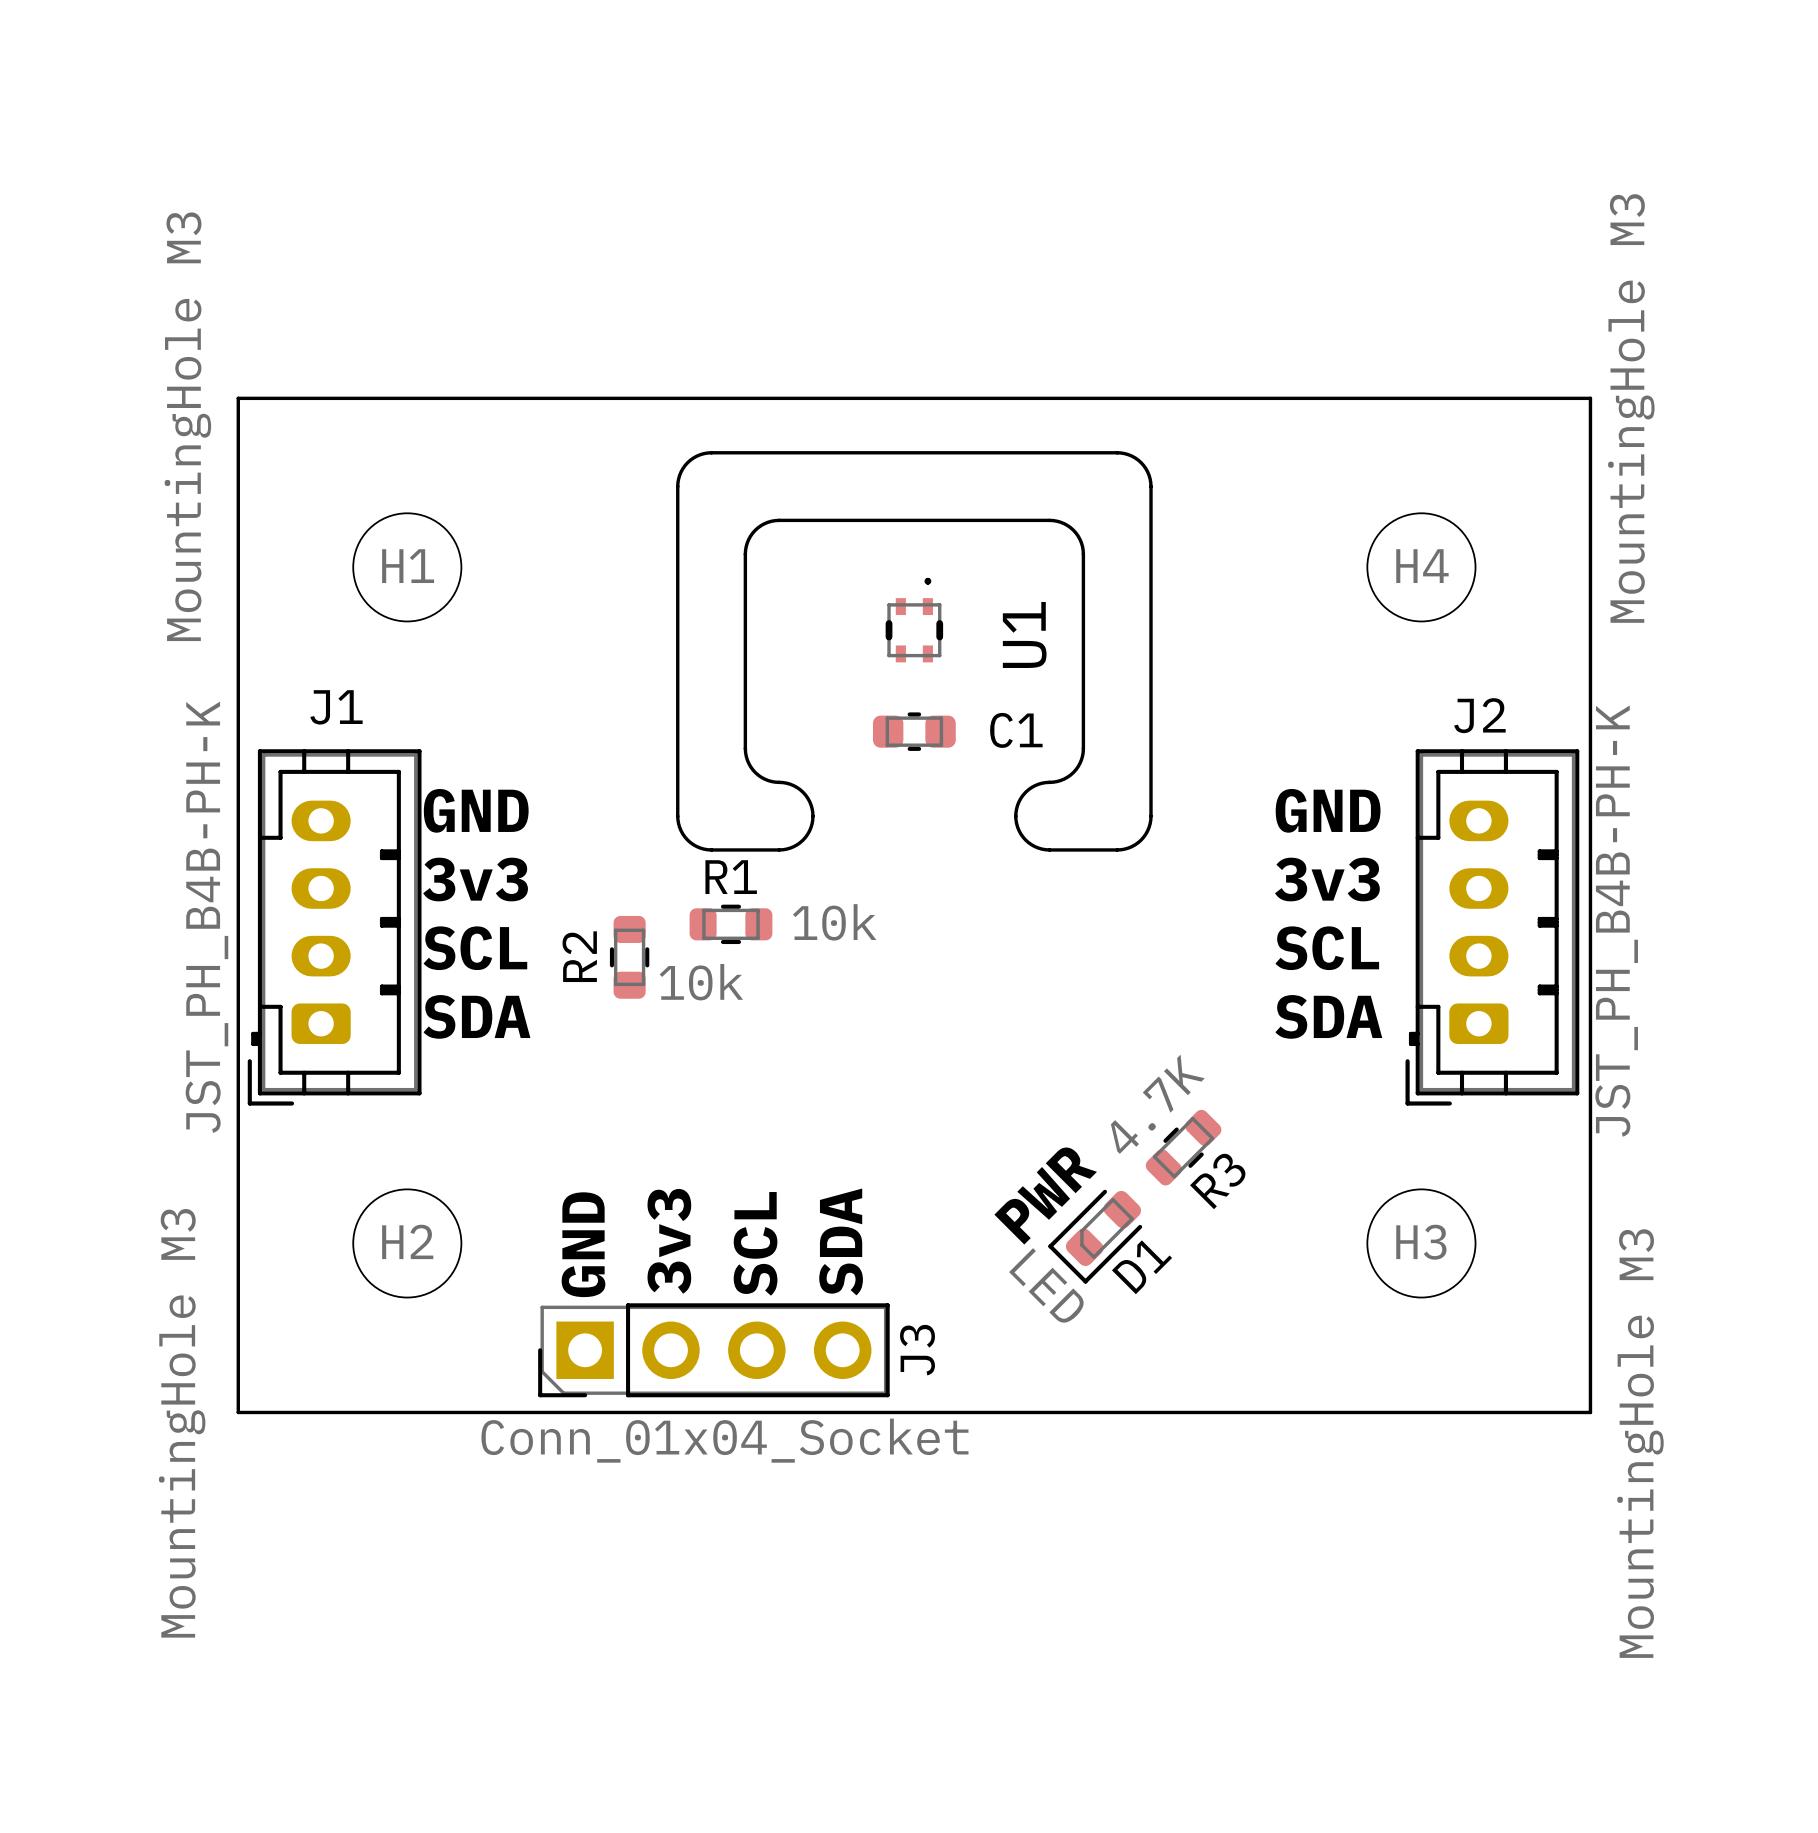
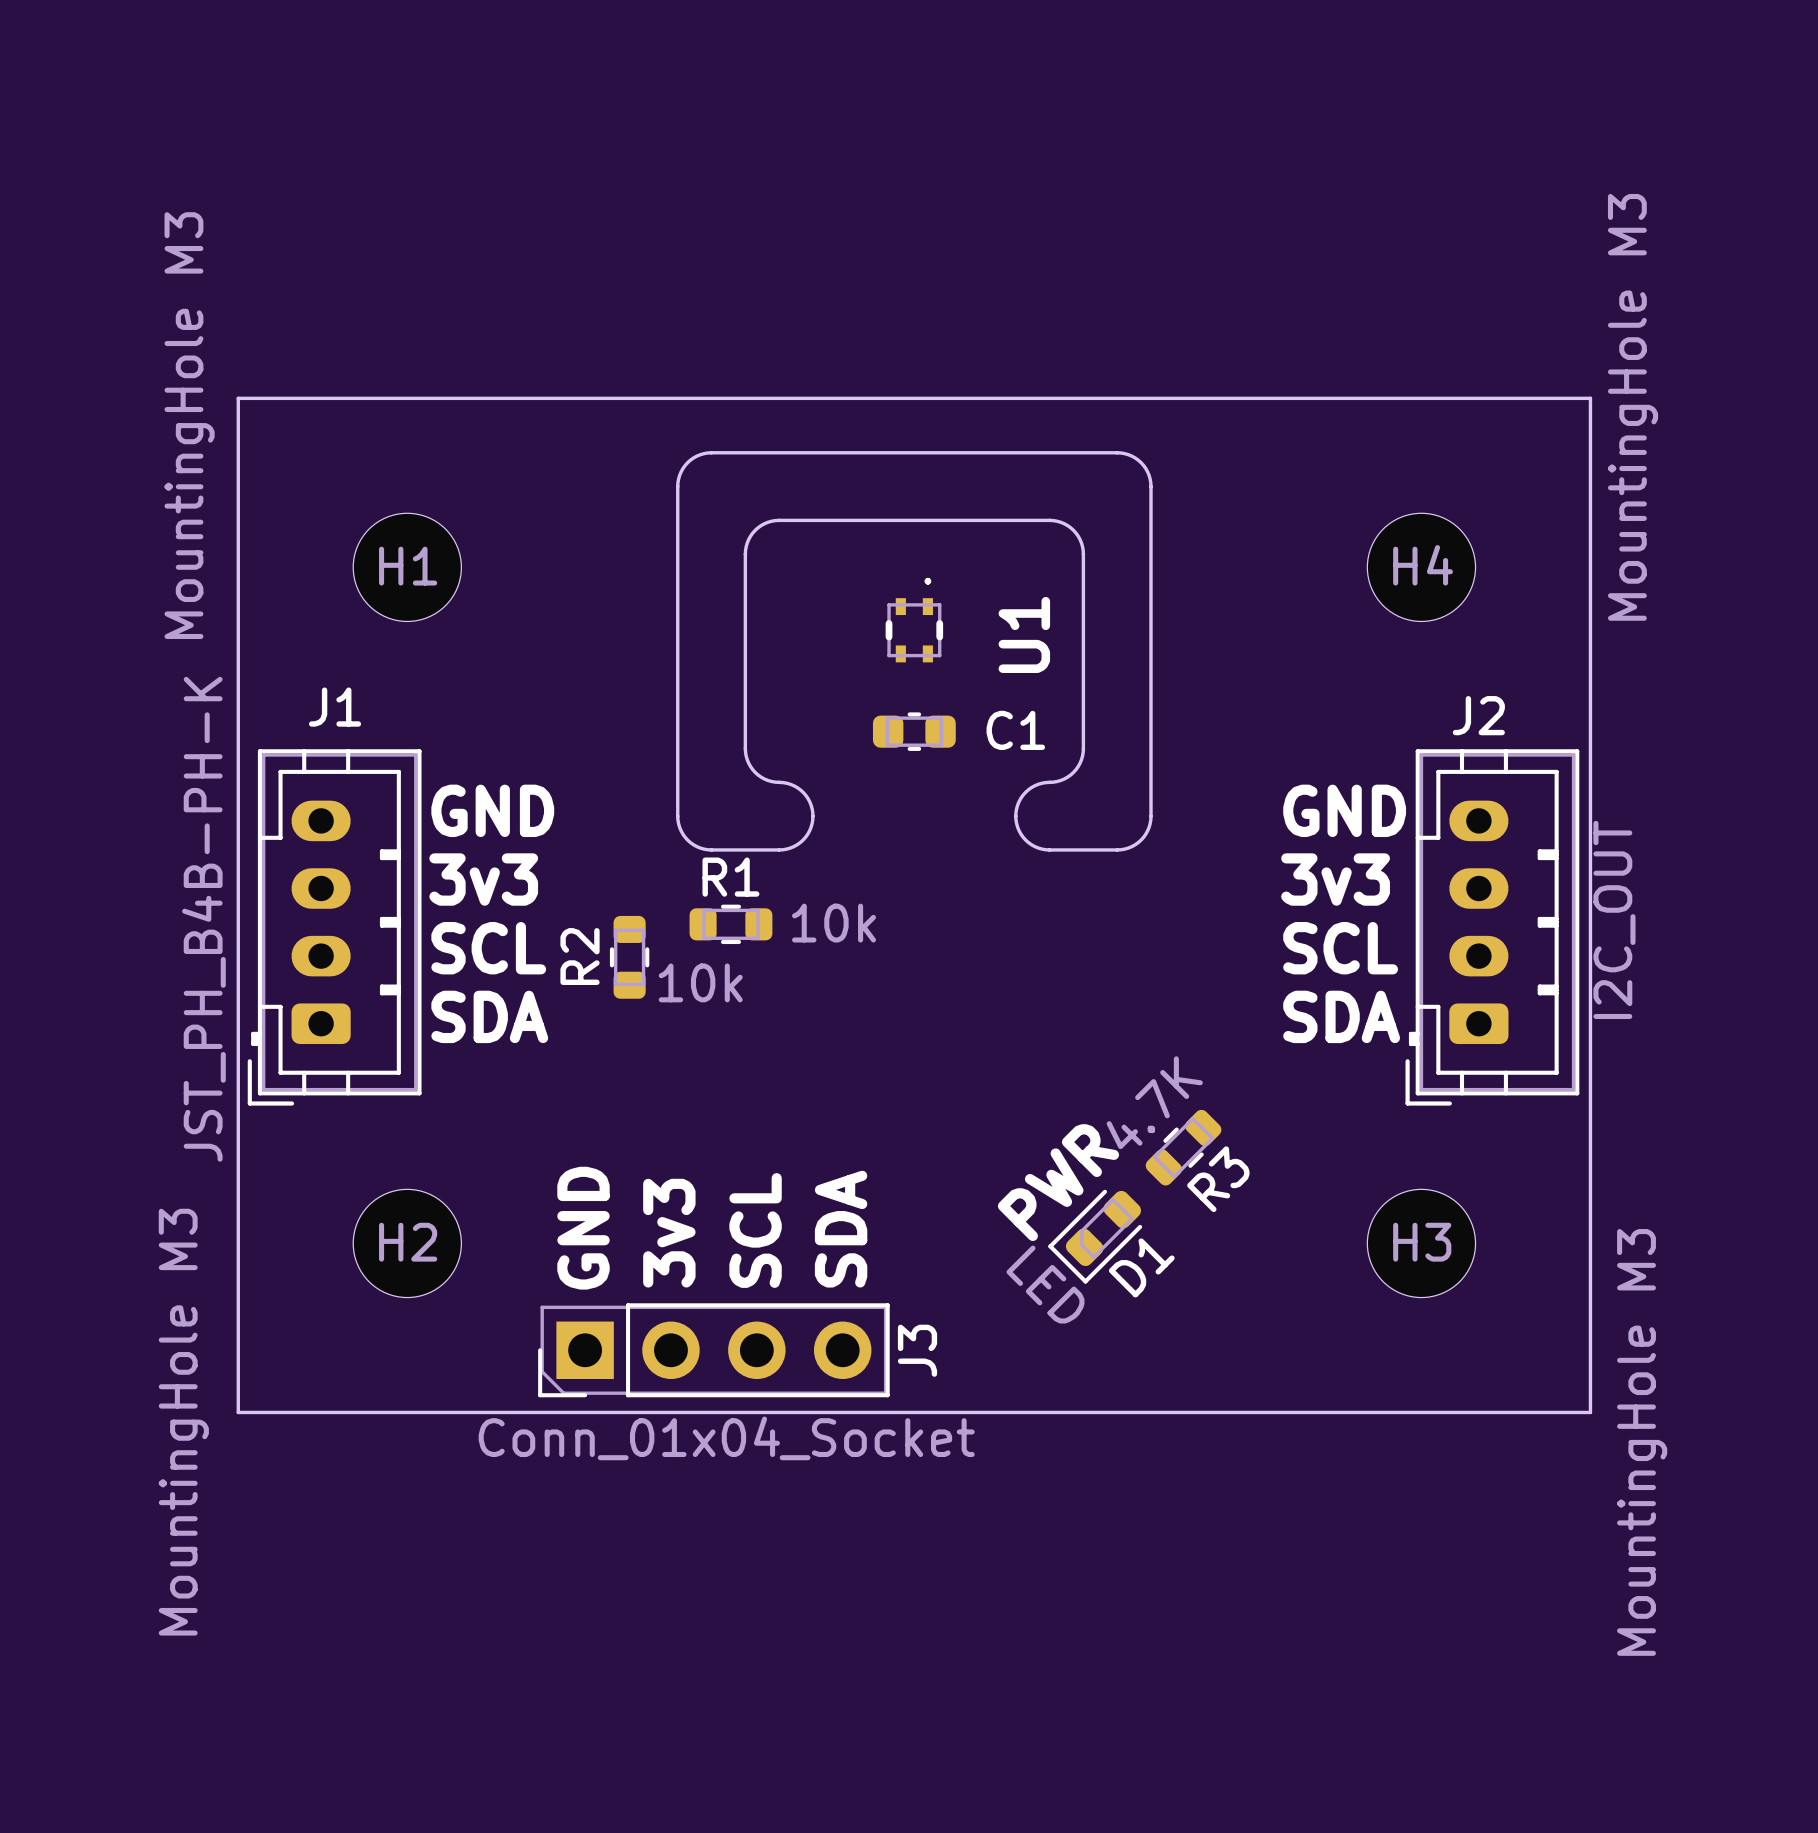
J2 value: JST_PH_B4B-PH-K (1616, 921) -> I2C_OUT (1614, 919)

